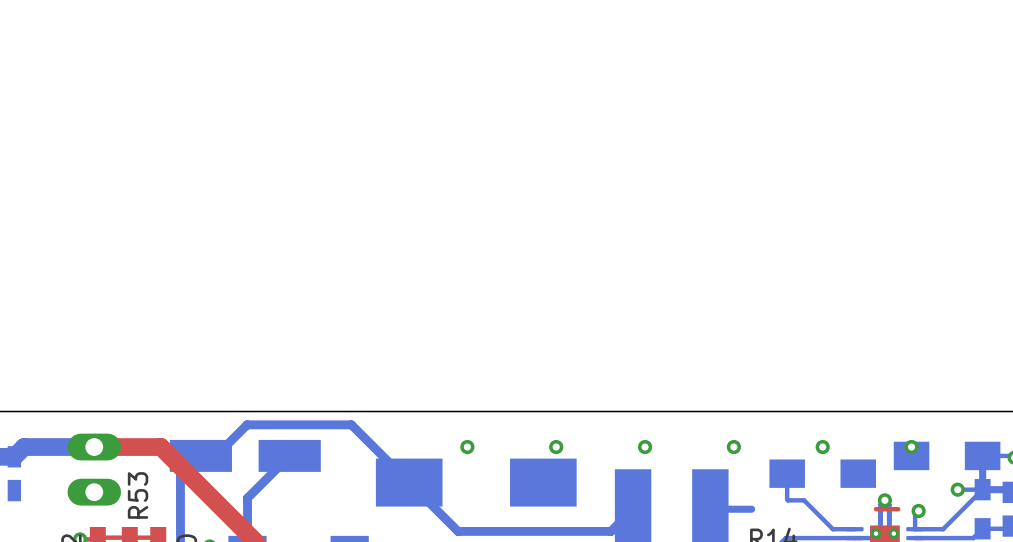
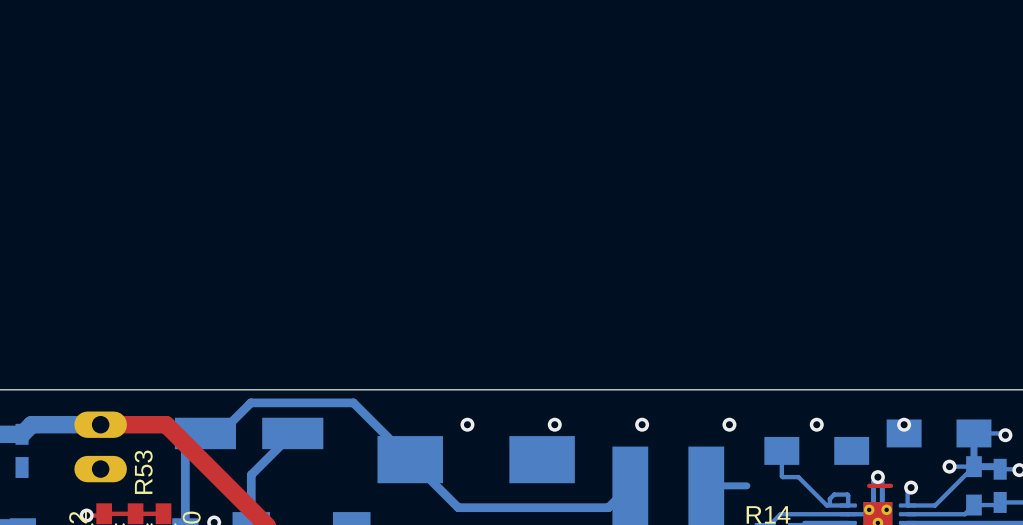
bottom track: none -> (829, 503) (829, 498) (834, 494) (847, 494) (848, 505)

